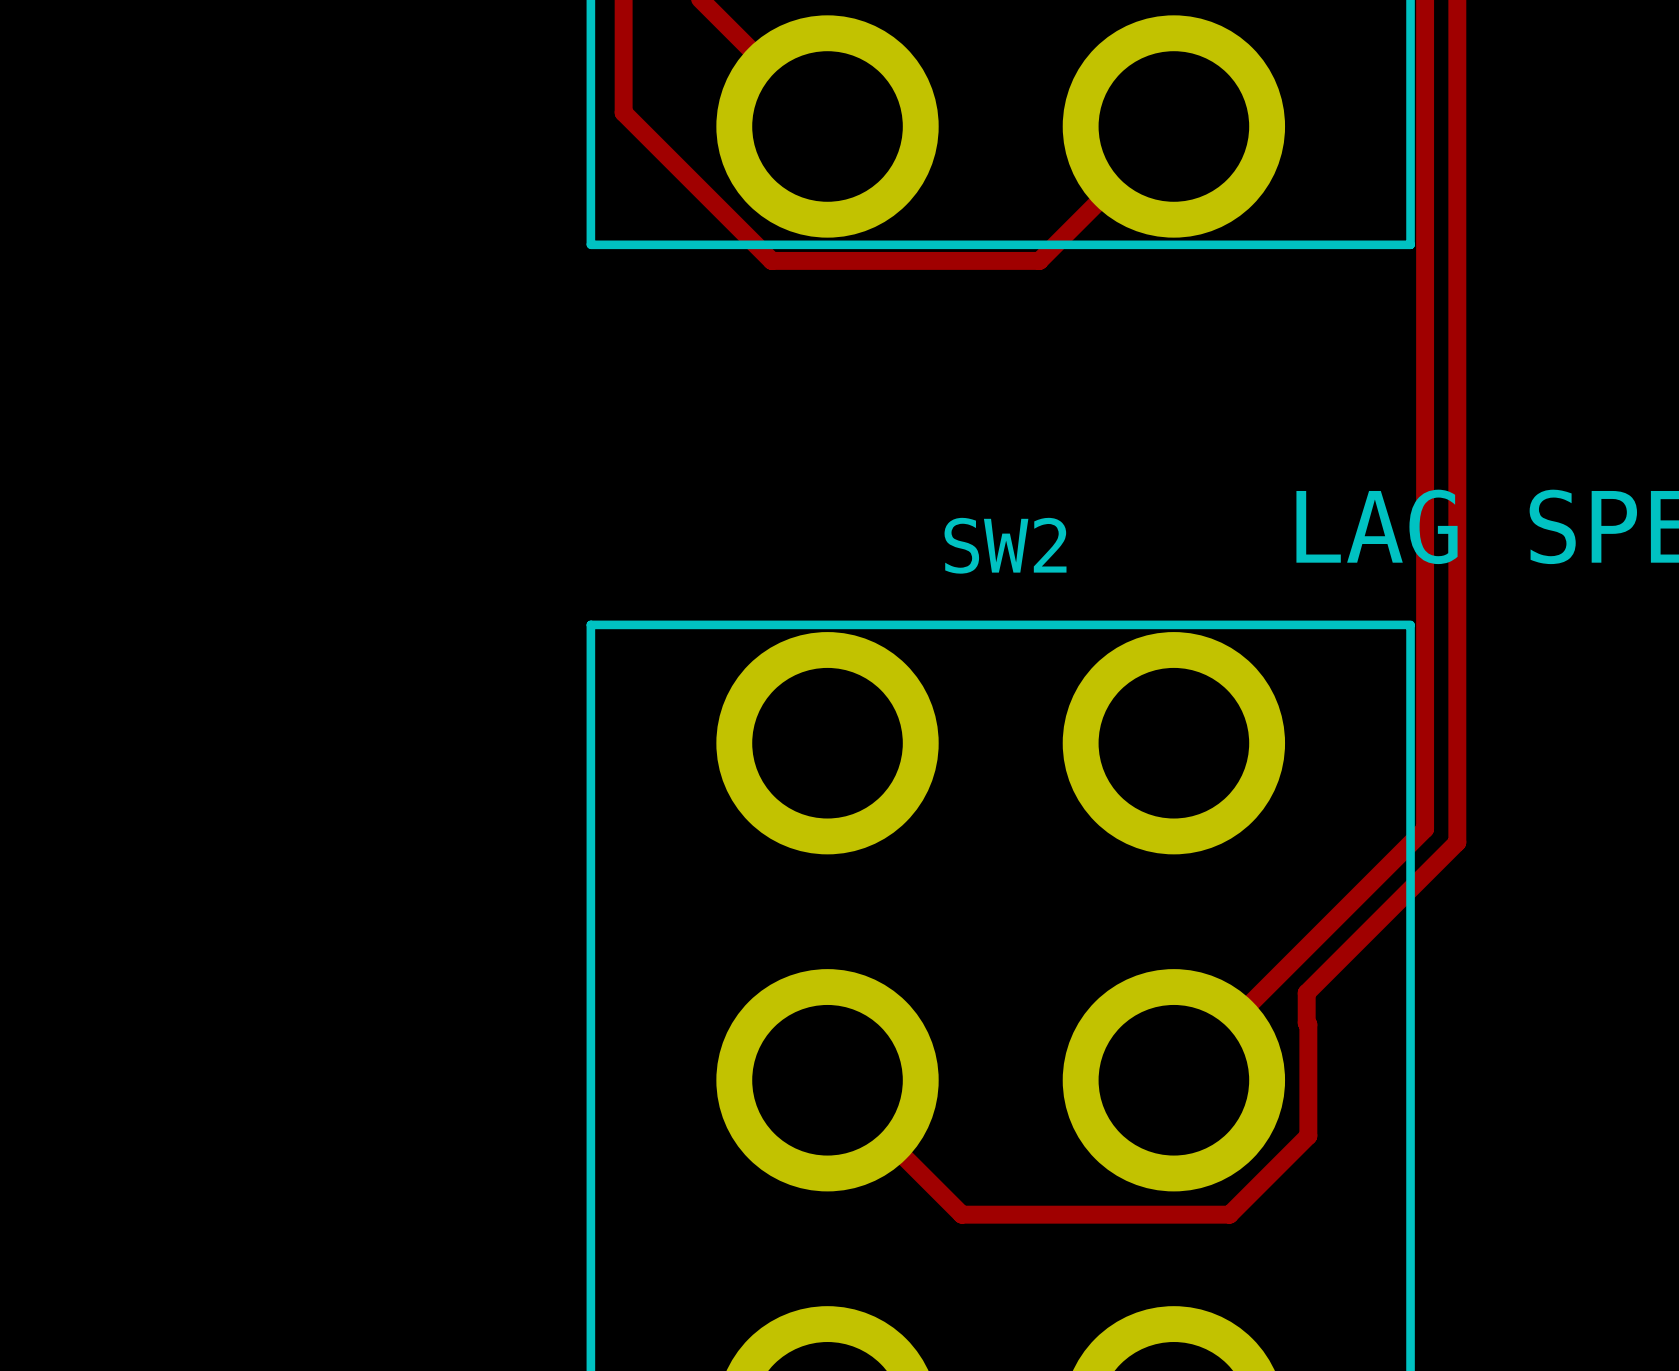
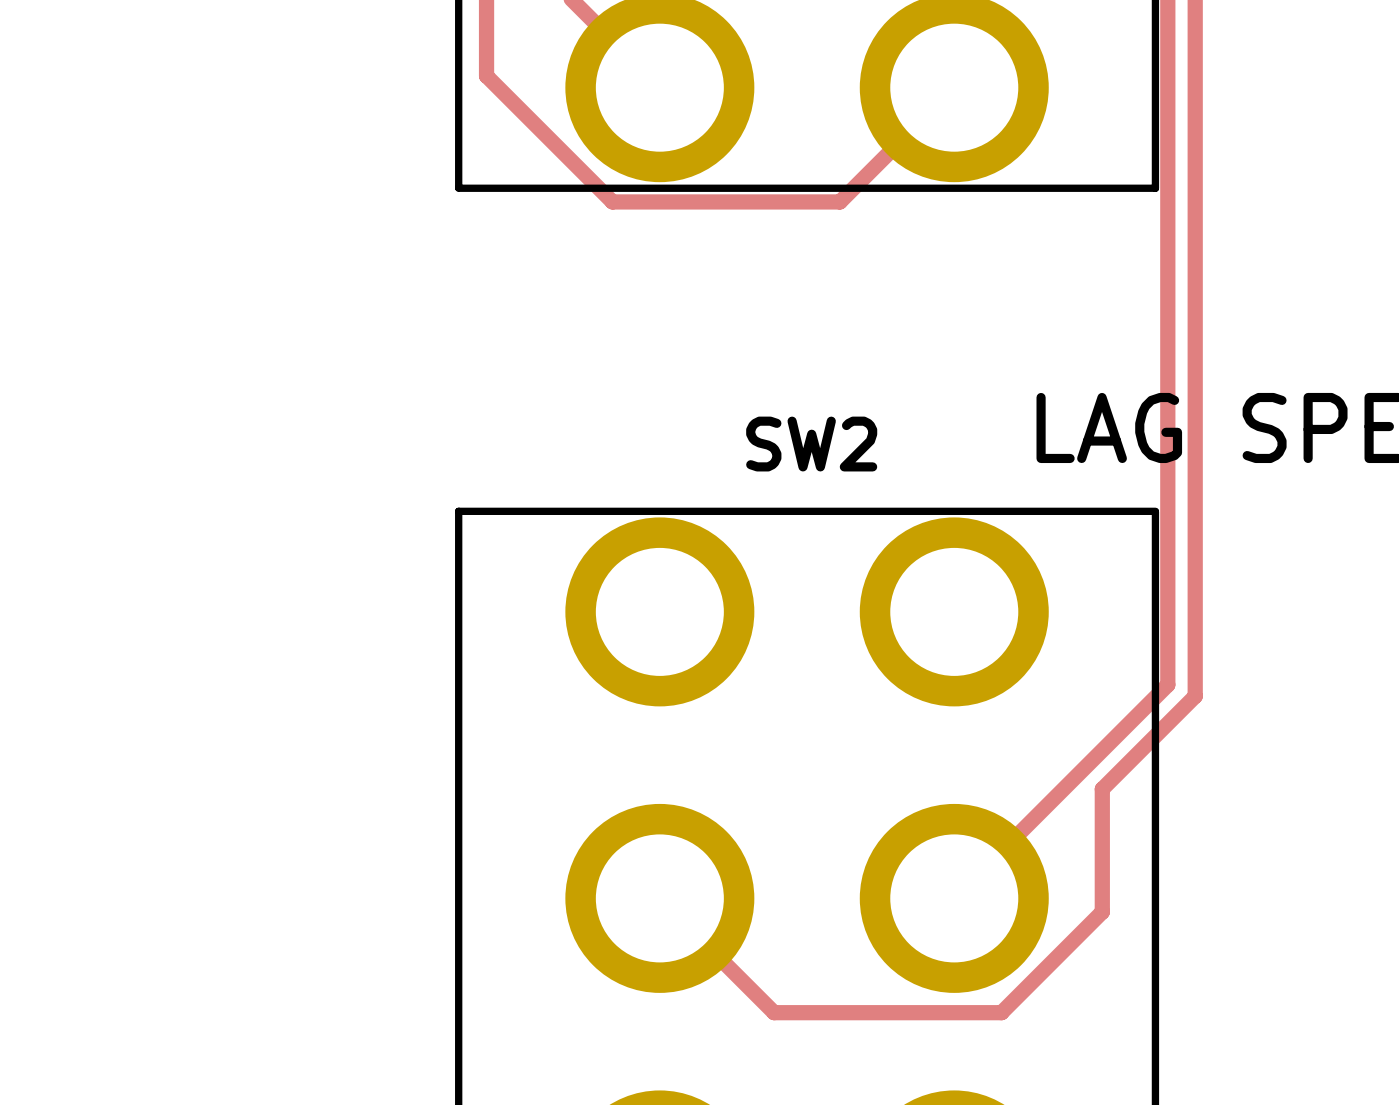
top track: (1348, 951) (1306, 993) (1308, 1135) -> (1102, 789) (1102, 911) (1068, 945)

